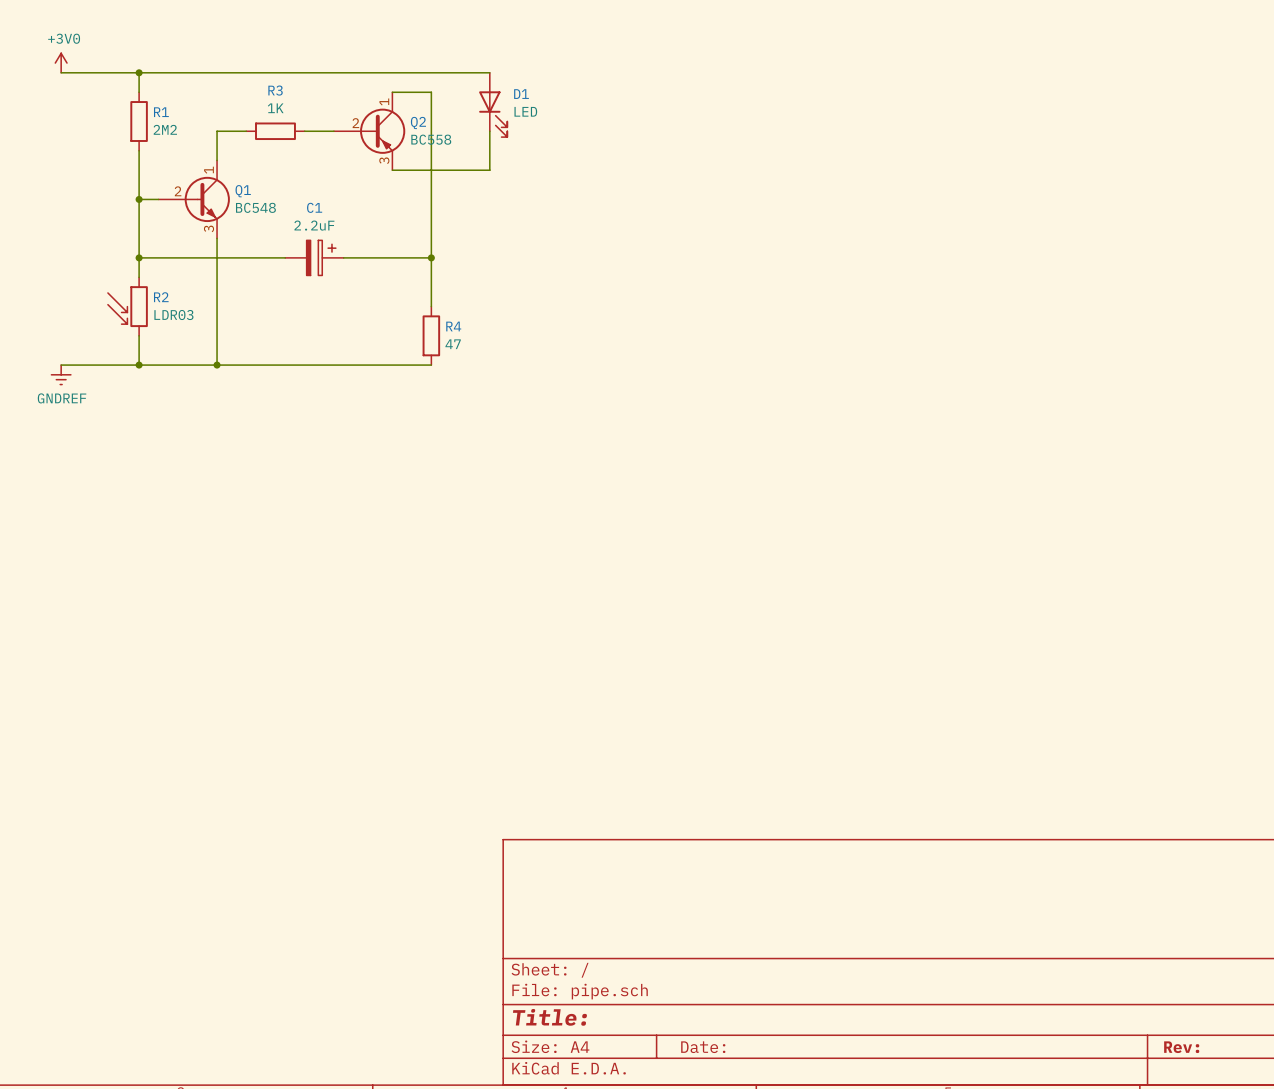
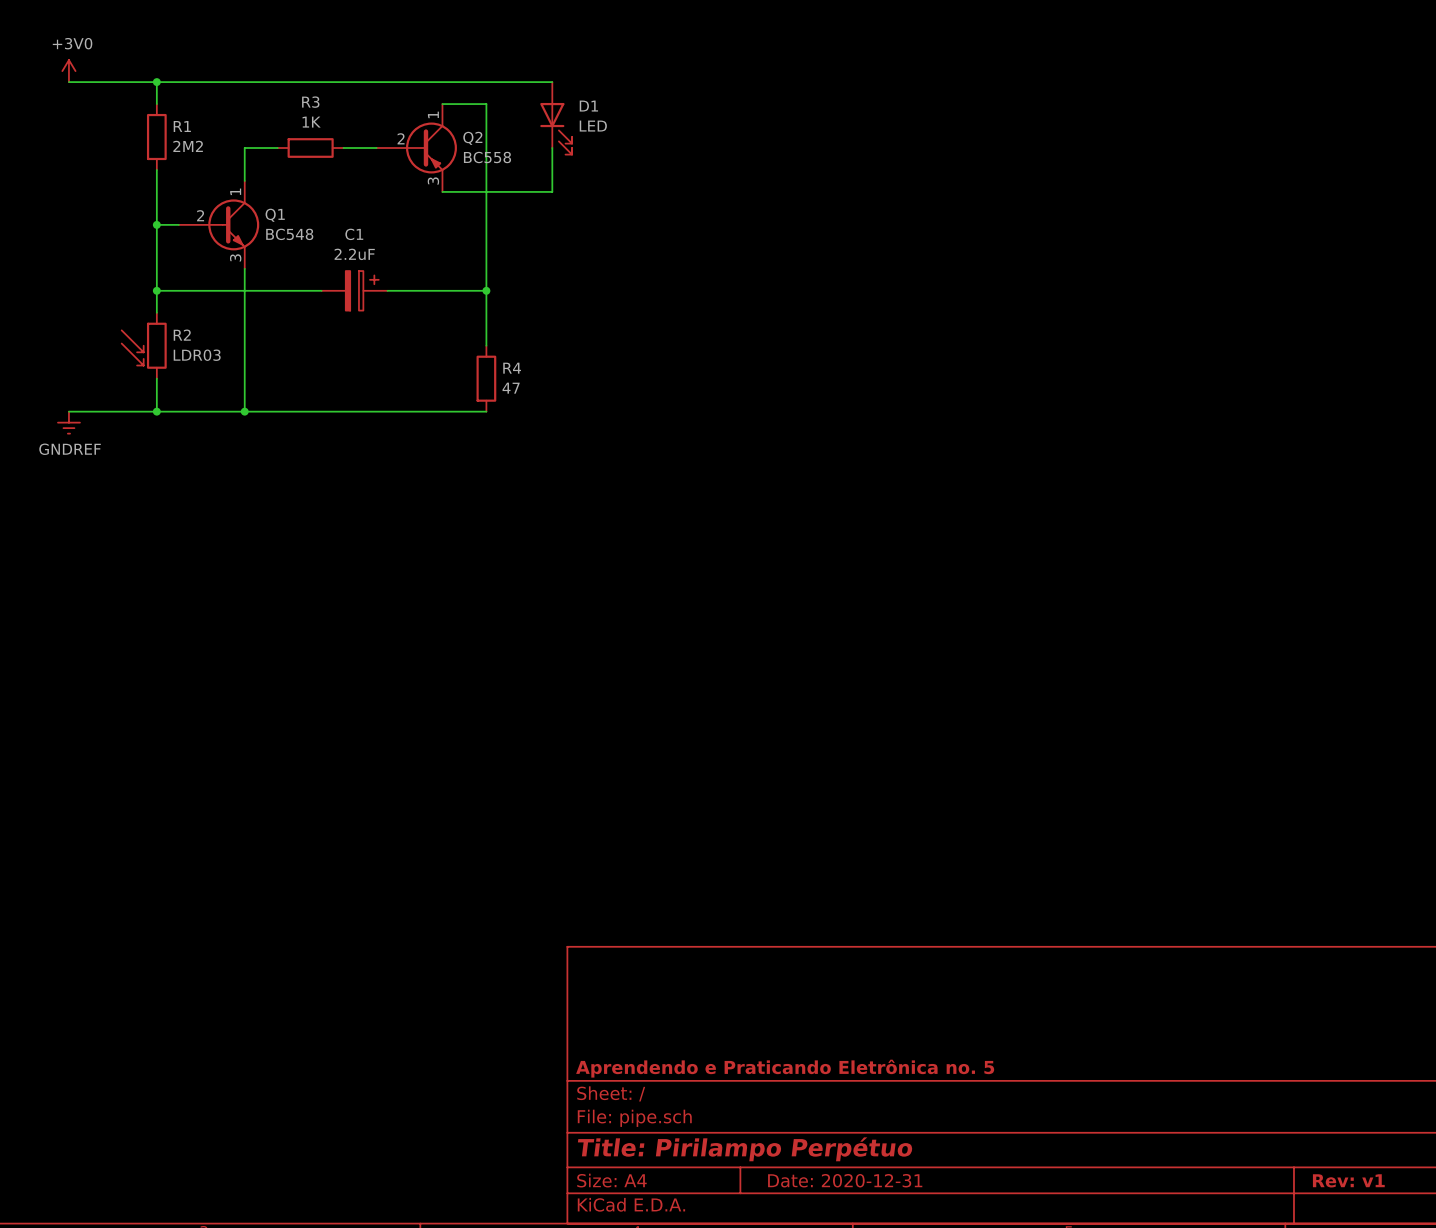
title block: none -> Aprendendo e Praticando Eletrônica no. 5 (785, 1068)
title block: Title: (549, 1017) -> Title: Pirilampo Perpétuo (745, 1149)
title block: Date: (703, 1047) -> Date: 2020-12-31 (845, 1180)
title block: Rev: (1181, 1047) -> Rev: v1 (1348, 1180)

